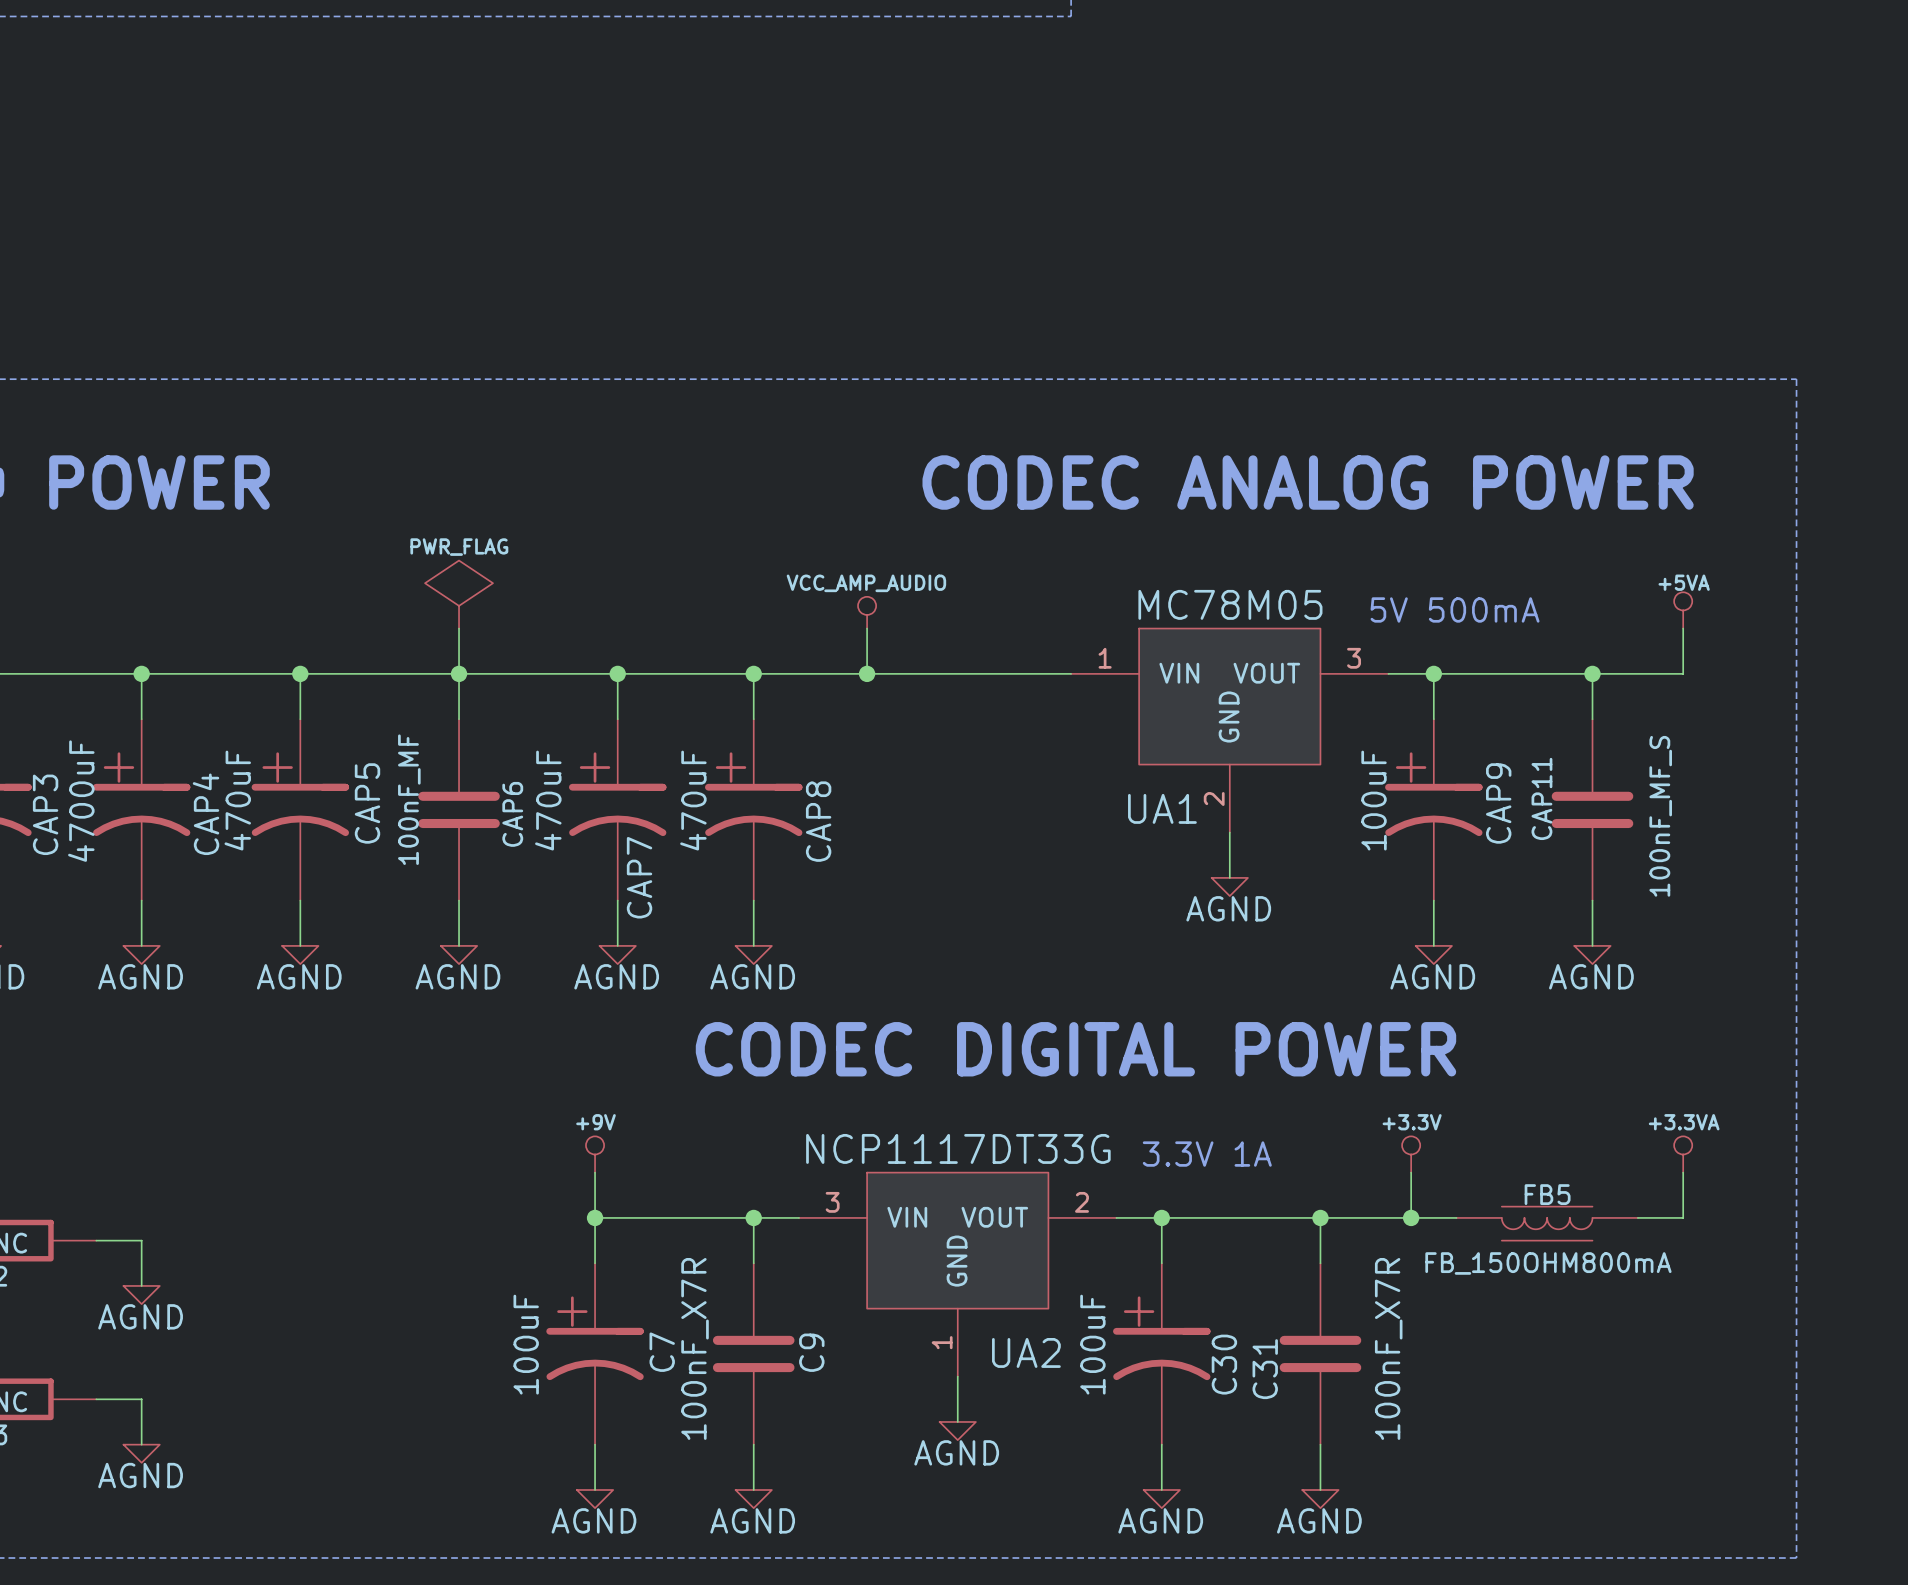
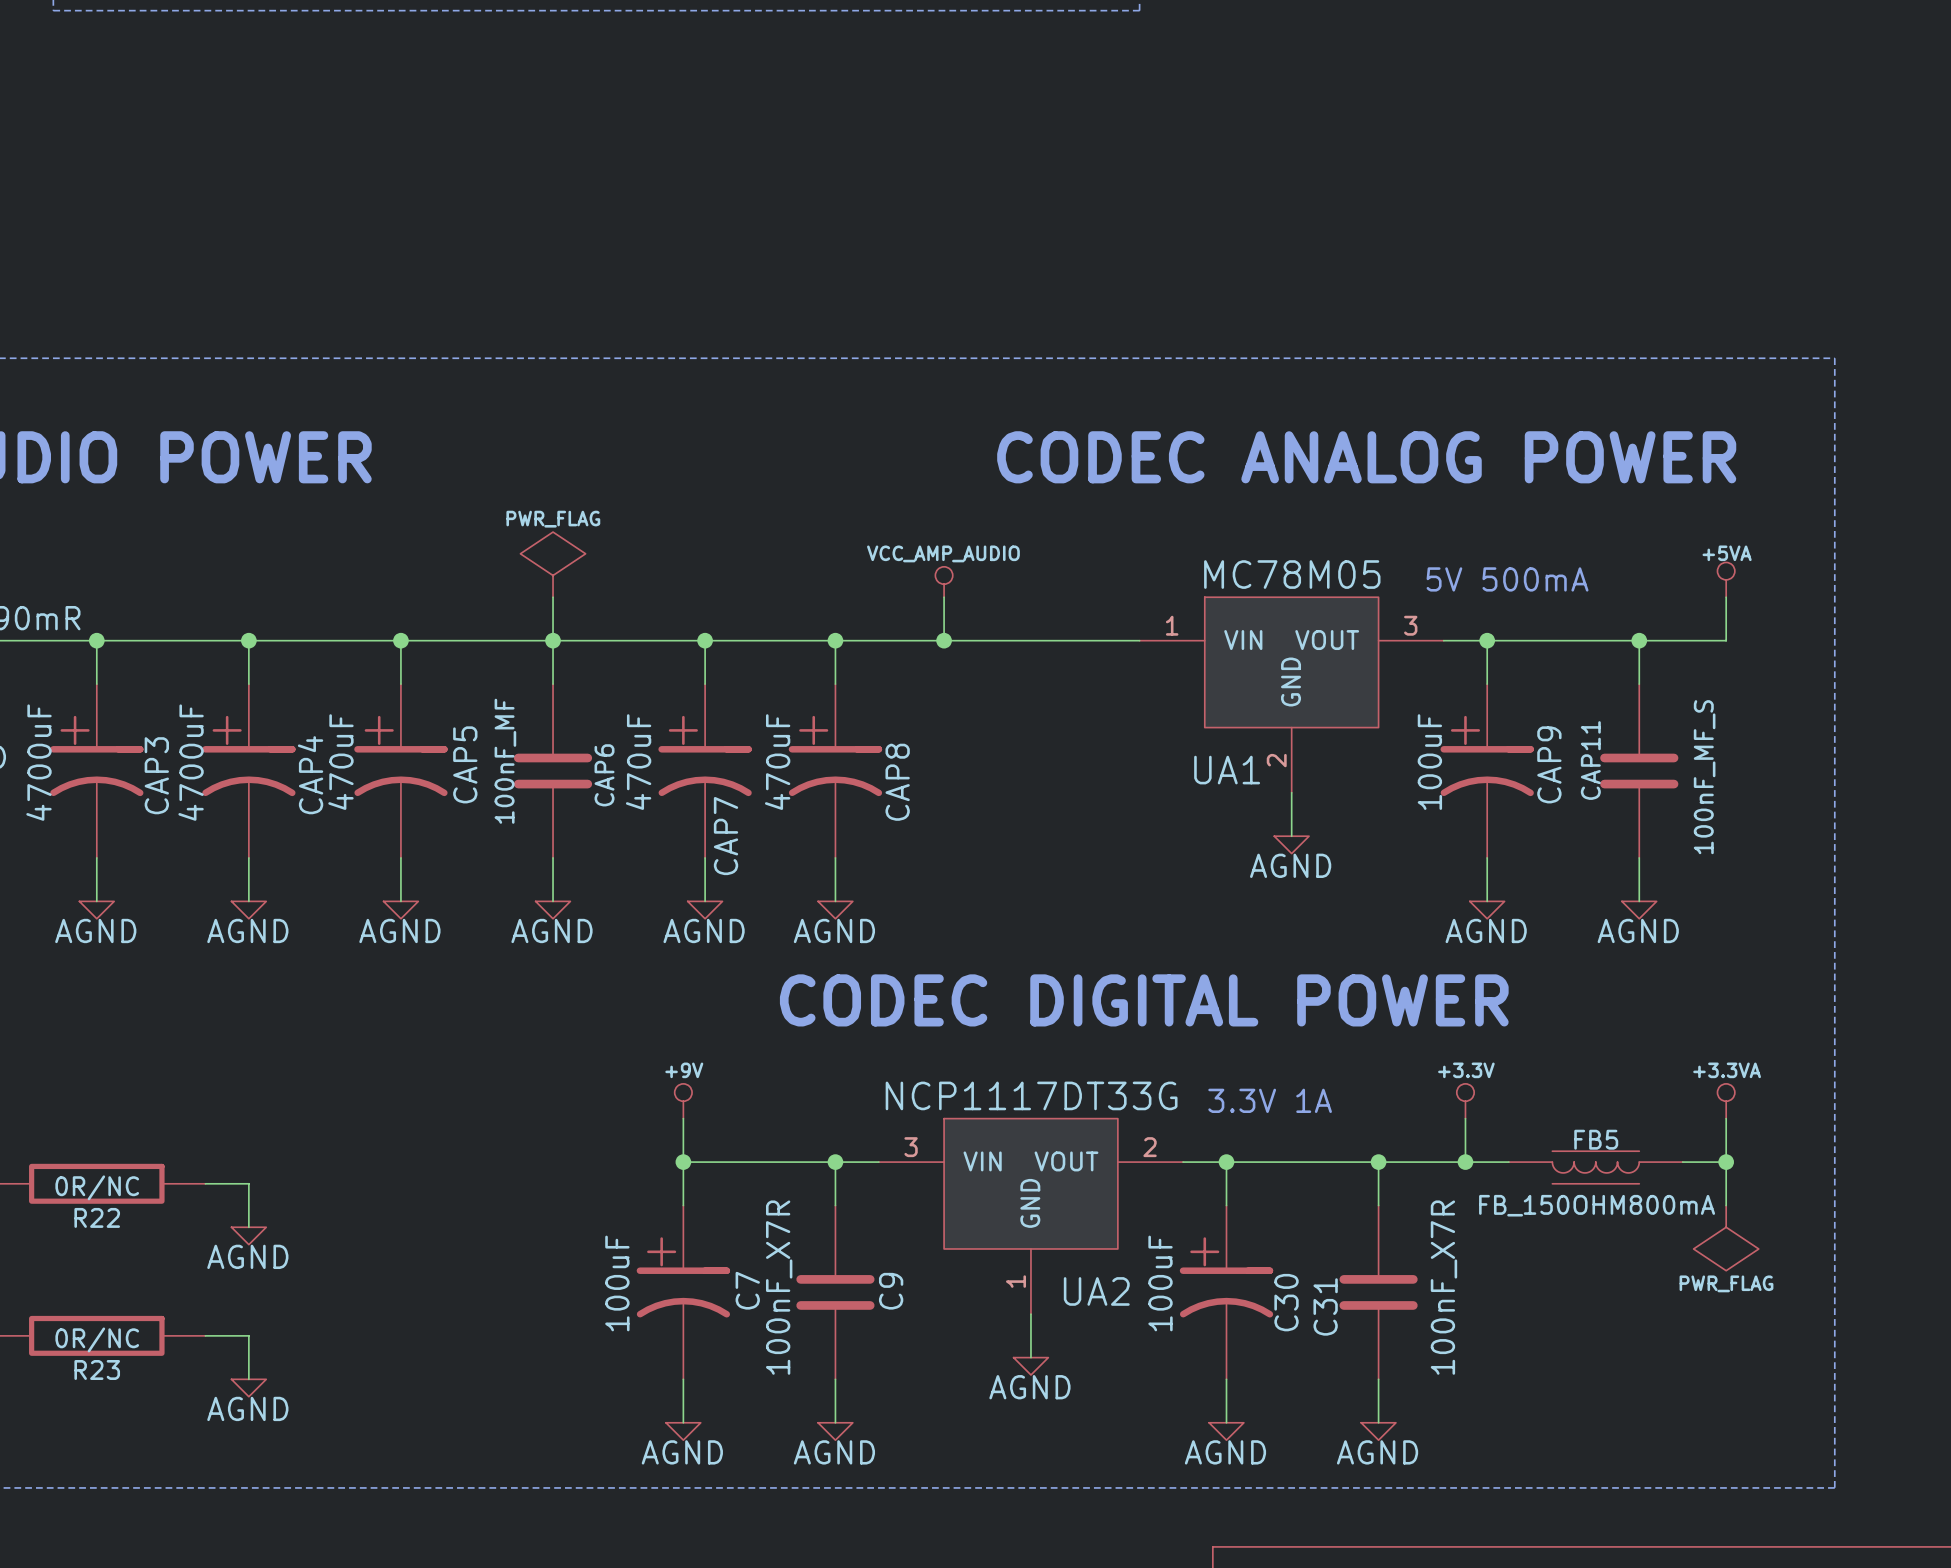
wire: none -> (1726, 1162) (1726, 1205)
junction: none -> (1726, 1162)
power symbol: none -> PWR_FLAG (1726, 1238)

